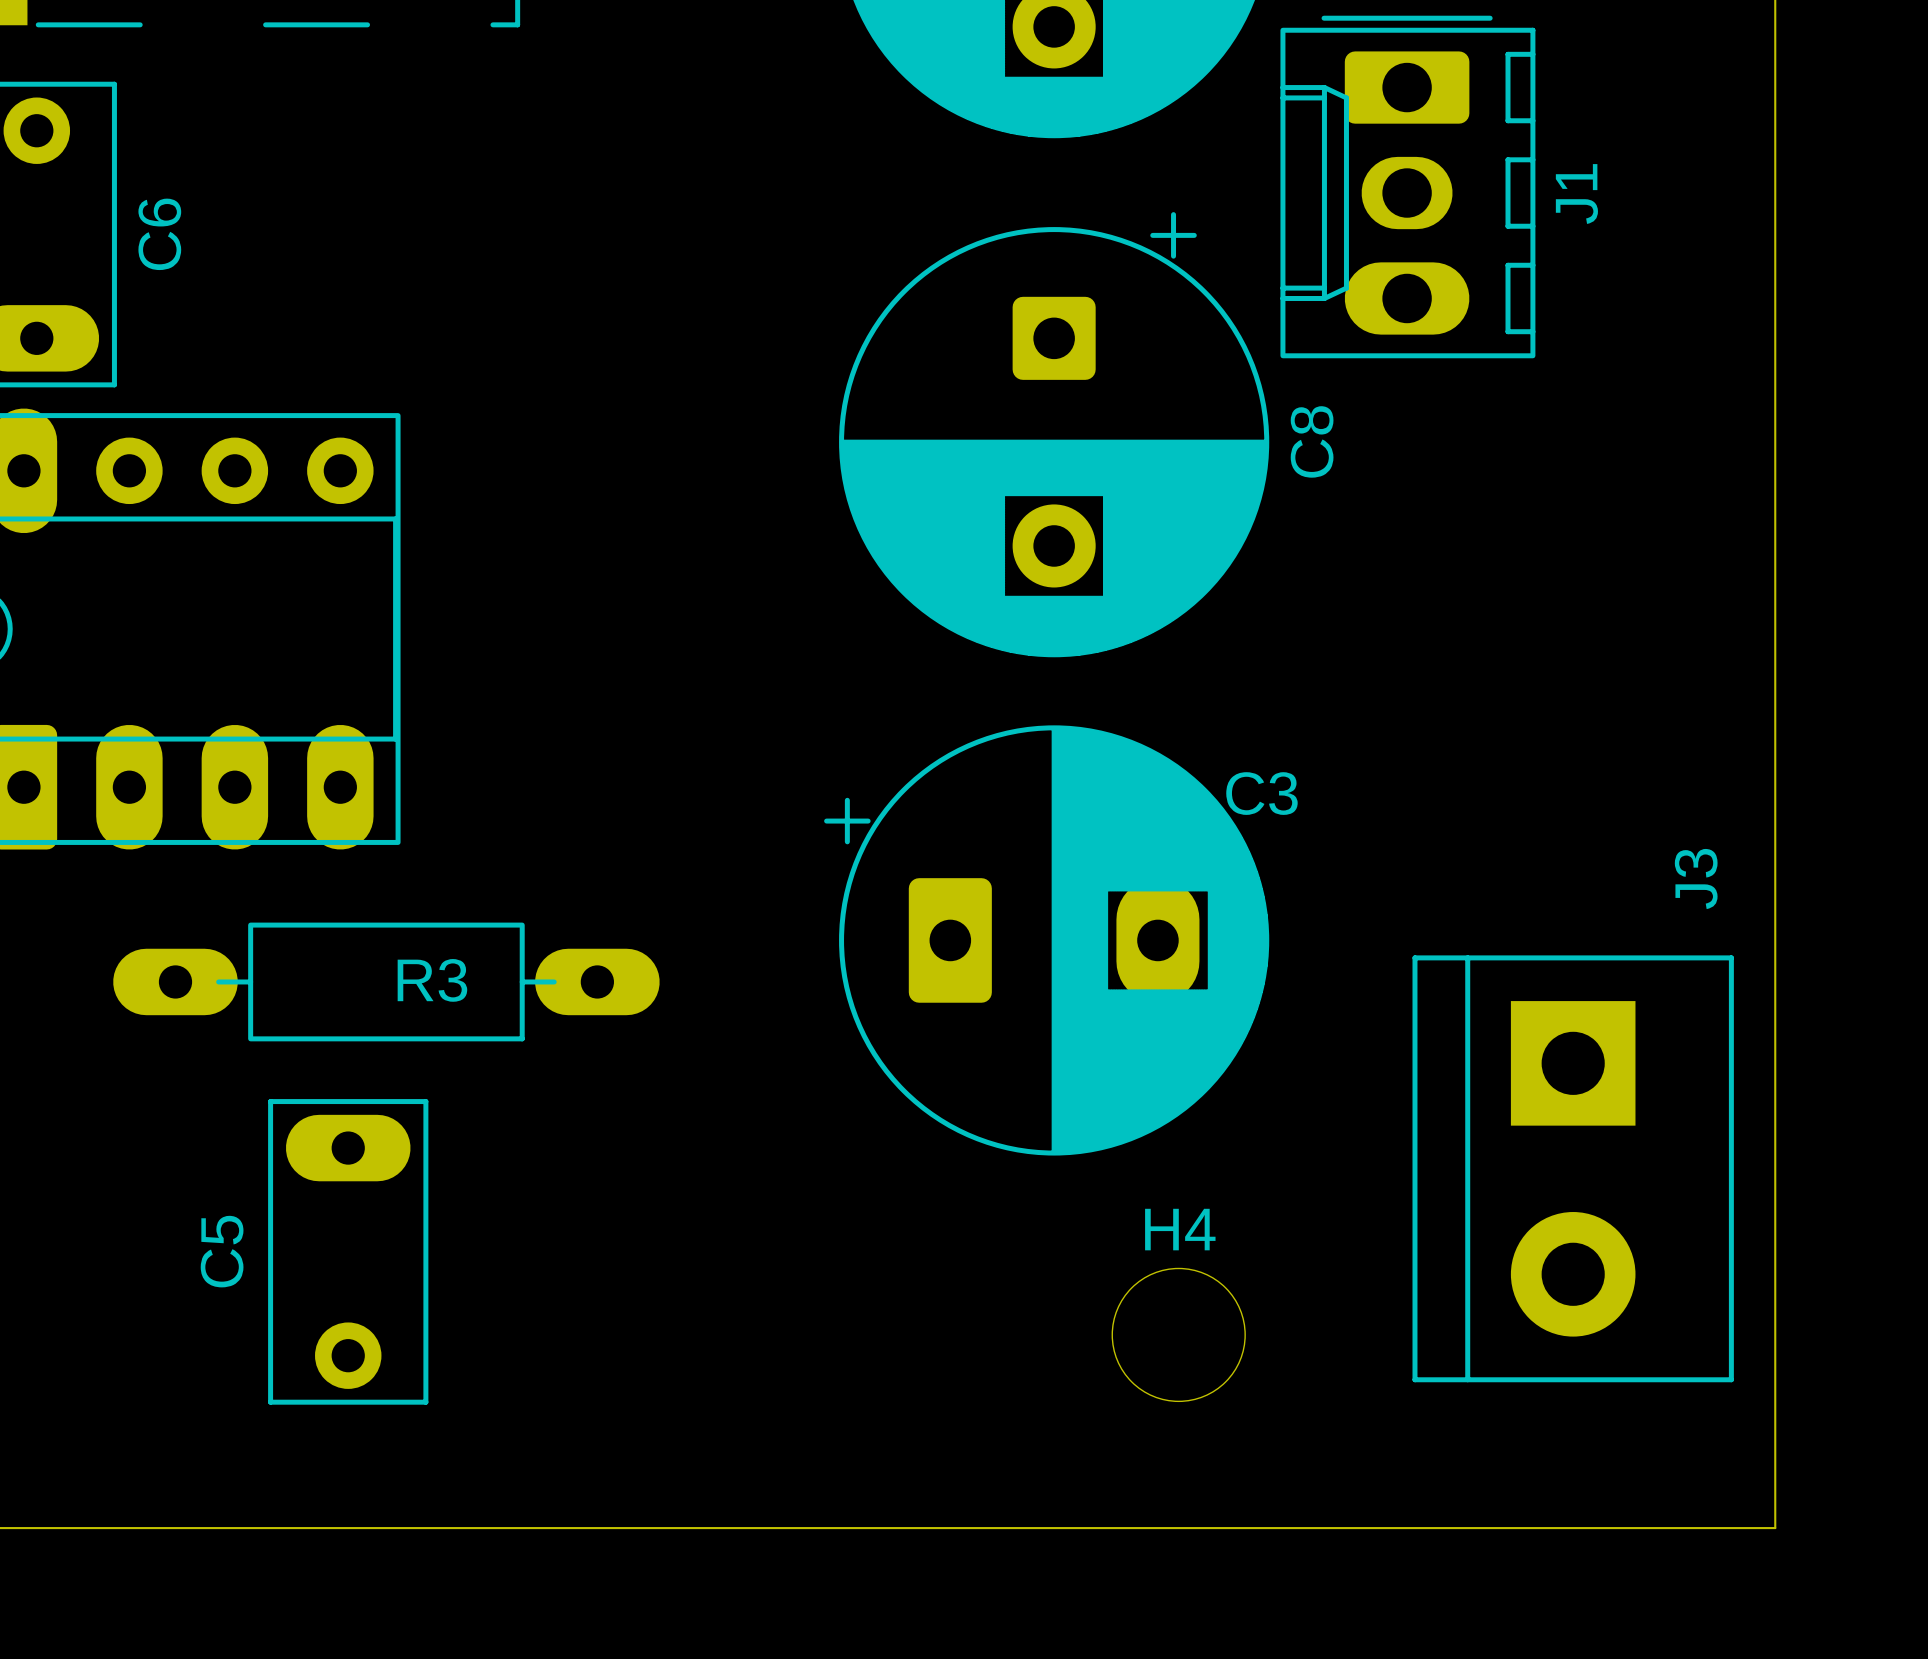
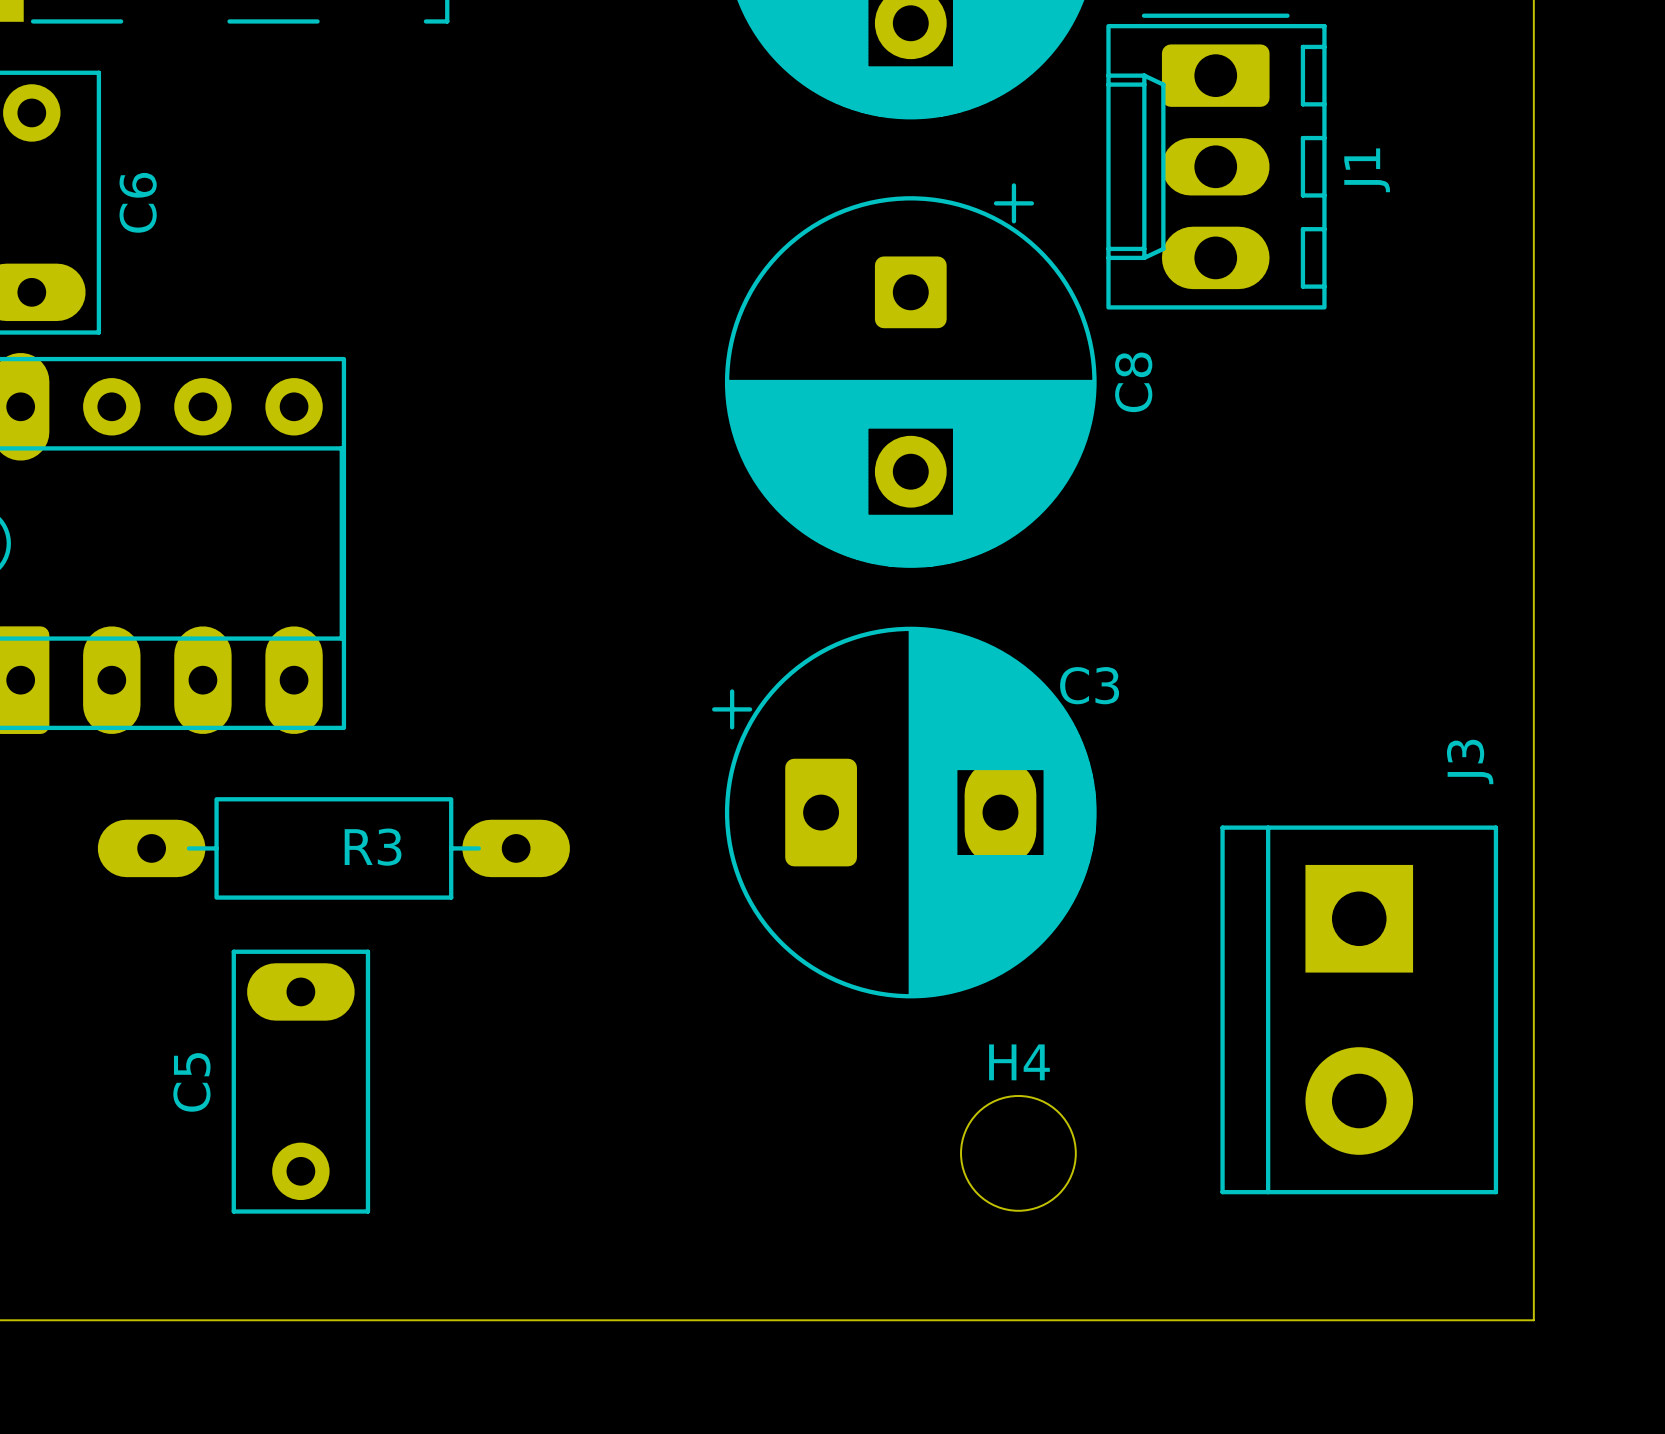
J1 footprint: [1280, 15, 1536, 359] -> [1106, 13, 1327, 310]

